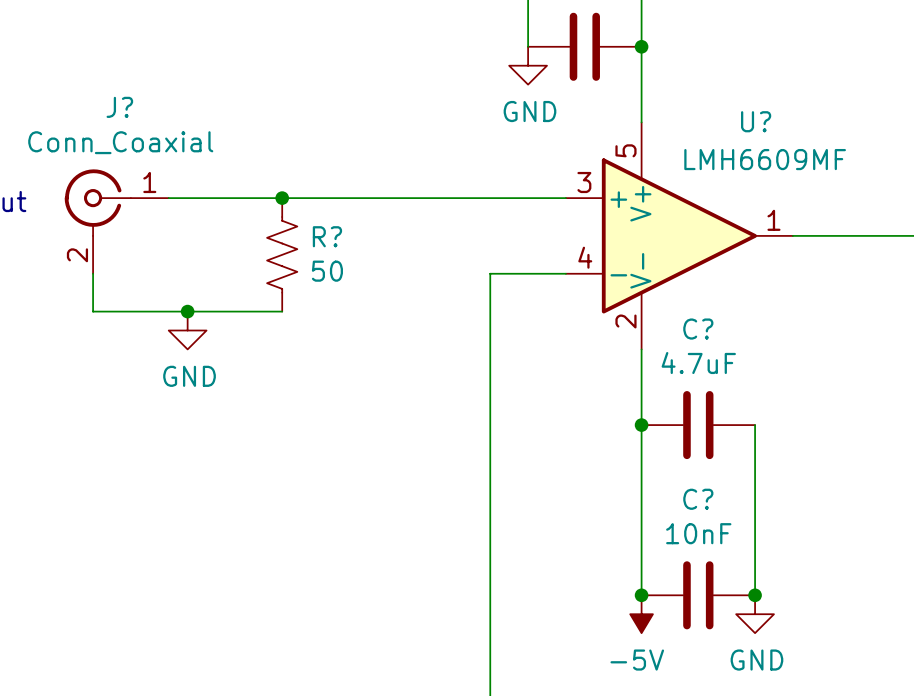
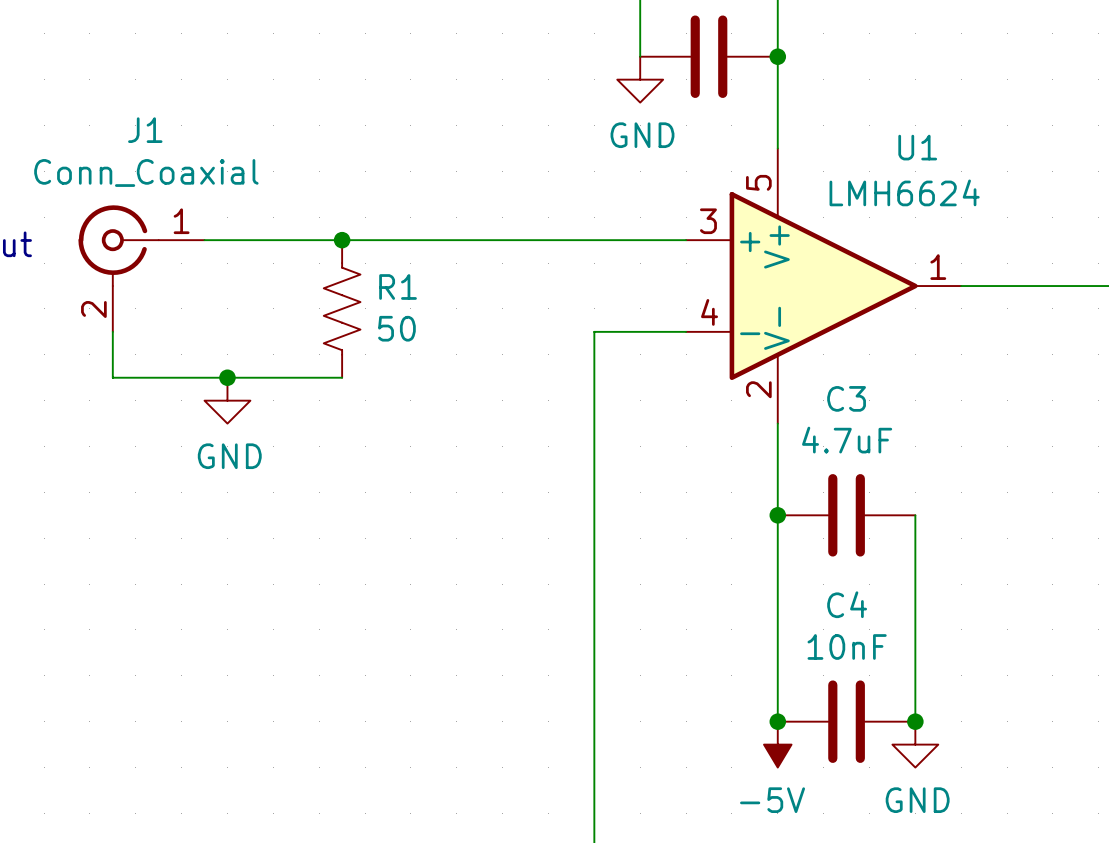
J? name: J? (119, 107) -> J1 (145, 130)
U? name: U? (756, 121) -> U1 (917, 147)
U? value: LMH6609MF (765, 159) -> LMH6624 (904, 192)
R? name: R? (327, 236) -> R1 (398, 286)
C? name: C? (698, 329) -> C3 (846, 398)
C? name: C? (698, 499) -> C4 (847, 604)

